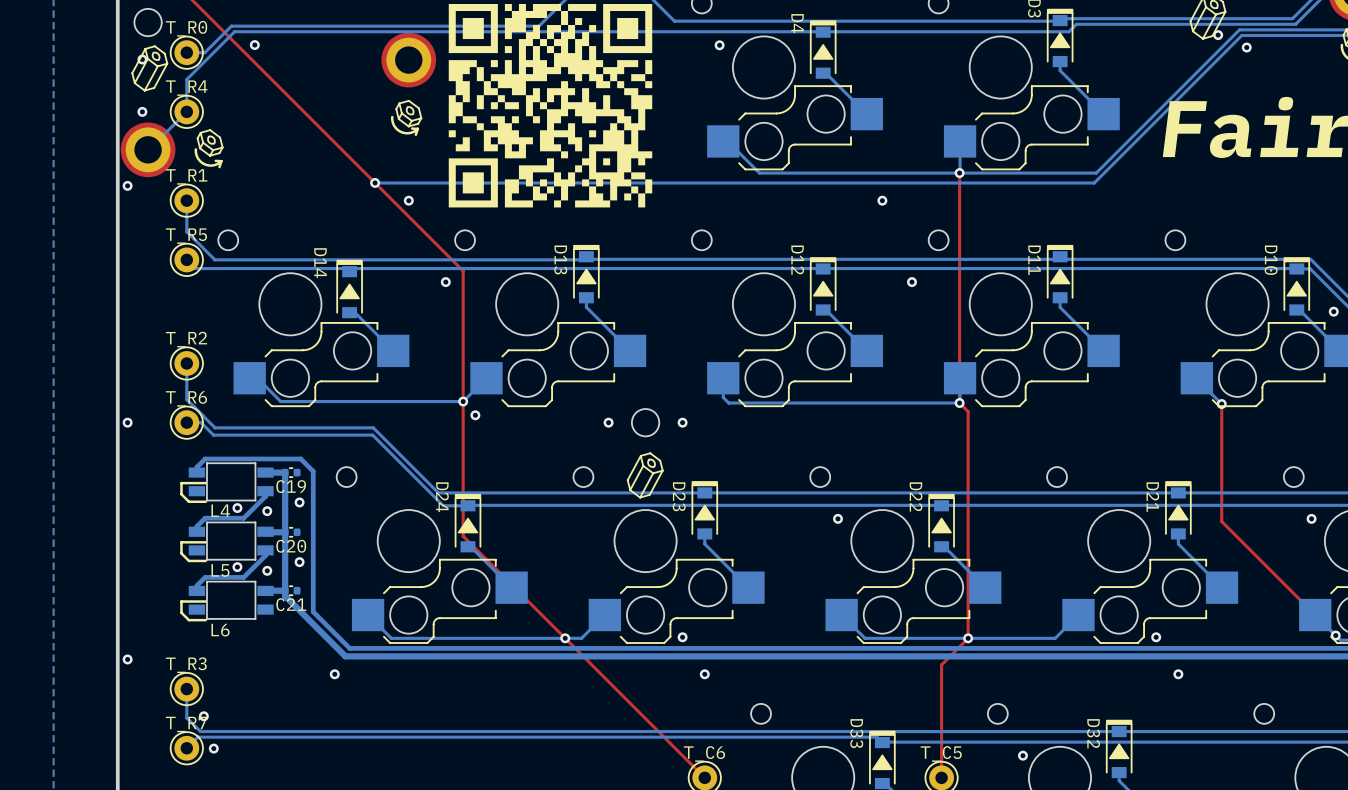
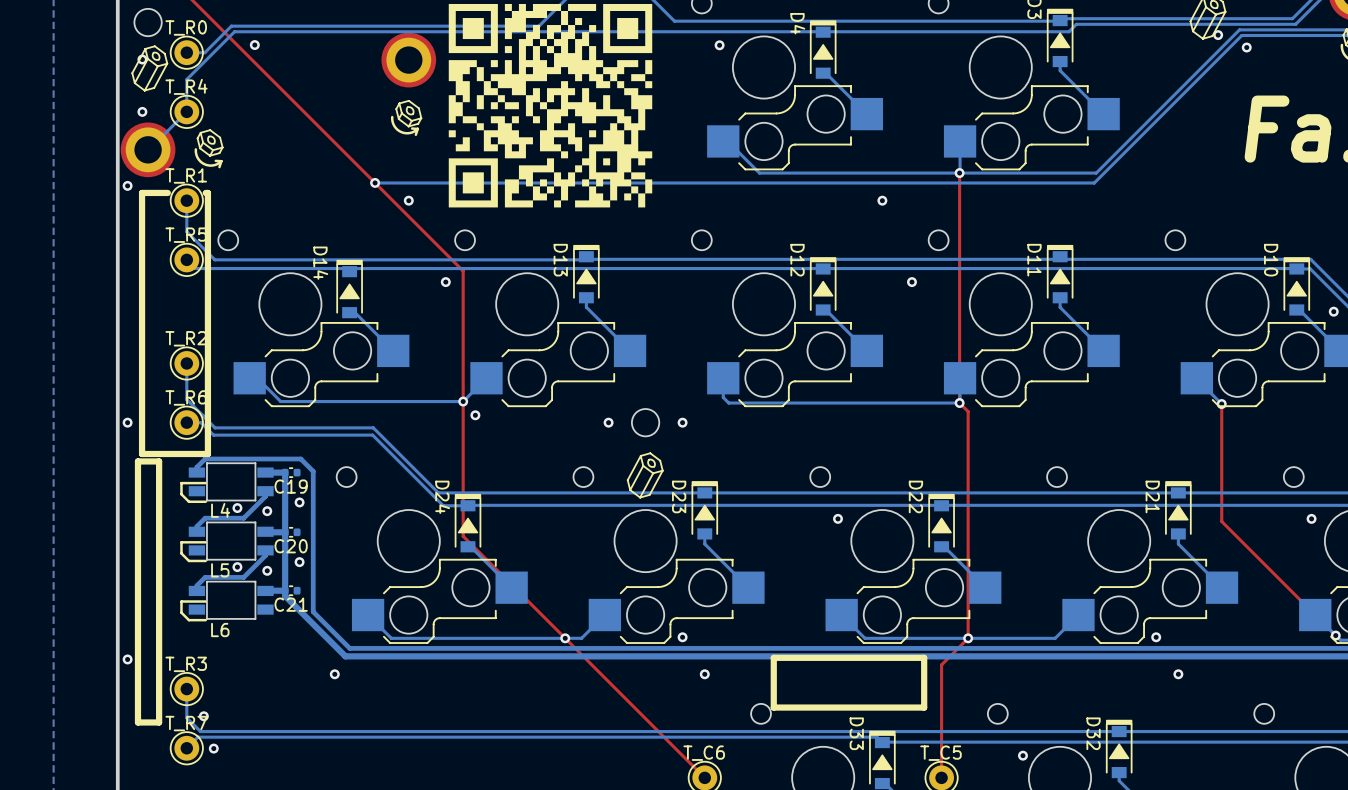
line: none -> (205, 192) (207, 192) (207, 453) (142, 453) (142, 192) (167, 192)
line: none -> (159, 461) (137, 461) (137, 722) (159, 722) (159, 461)
line: none -> (924, 657) (773, 657) (773, 707) (924, 707) (924, 657)

